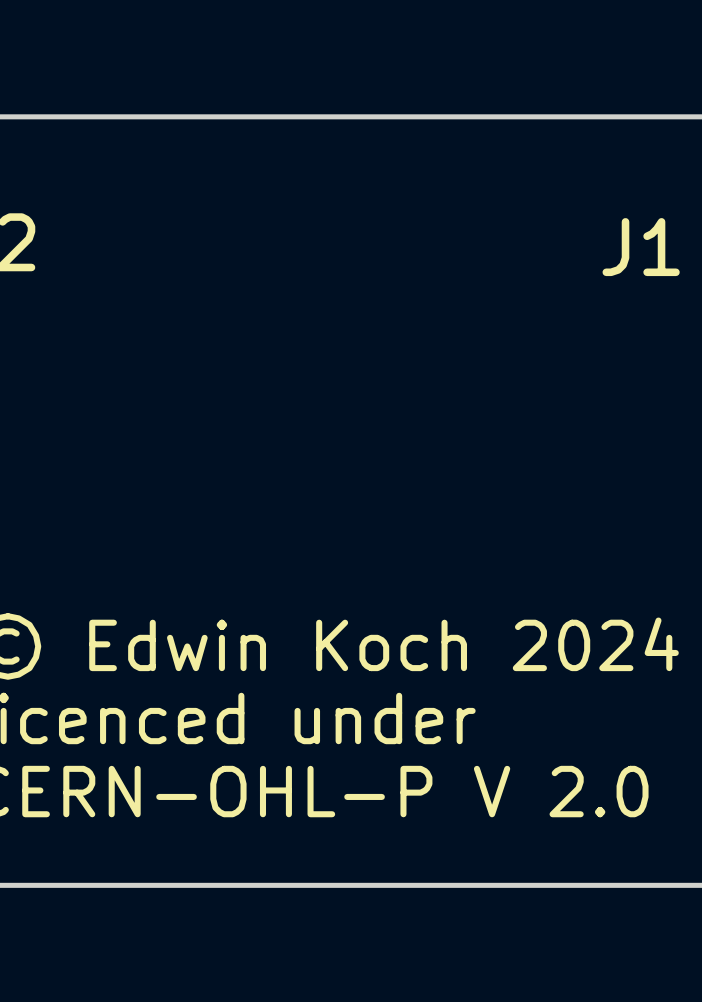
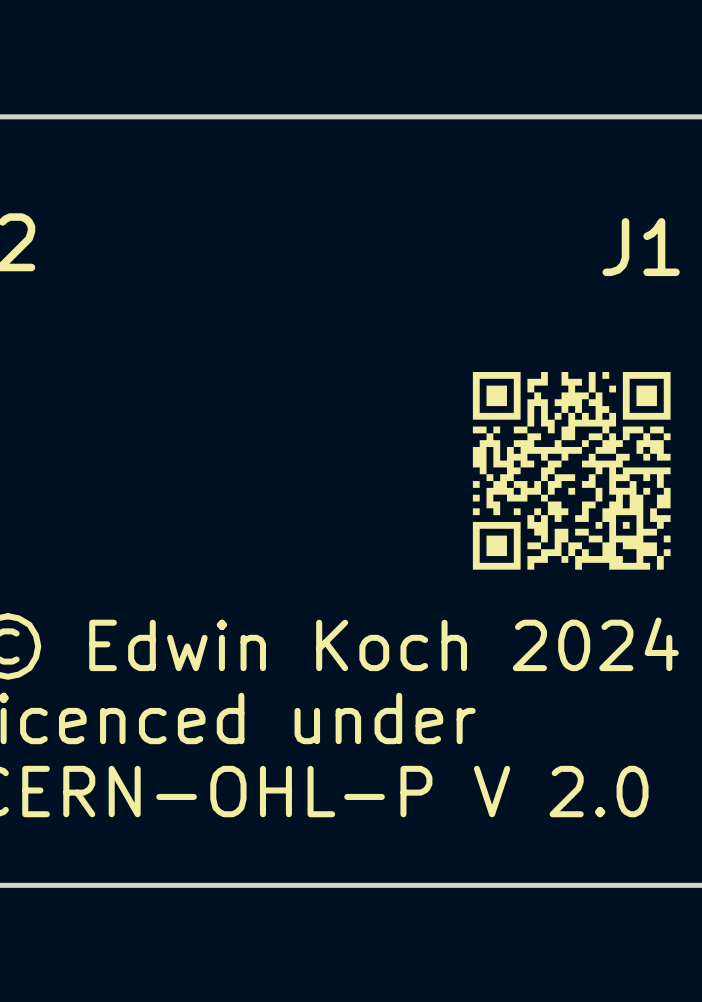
drawing: none -> [472, 371, 671, 570]

